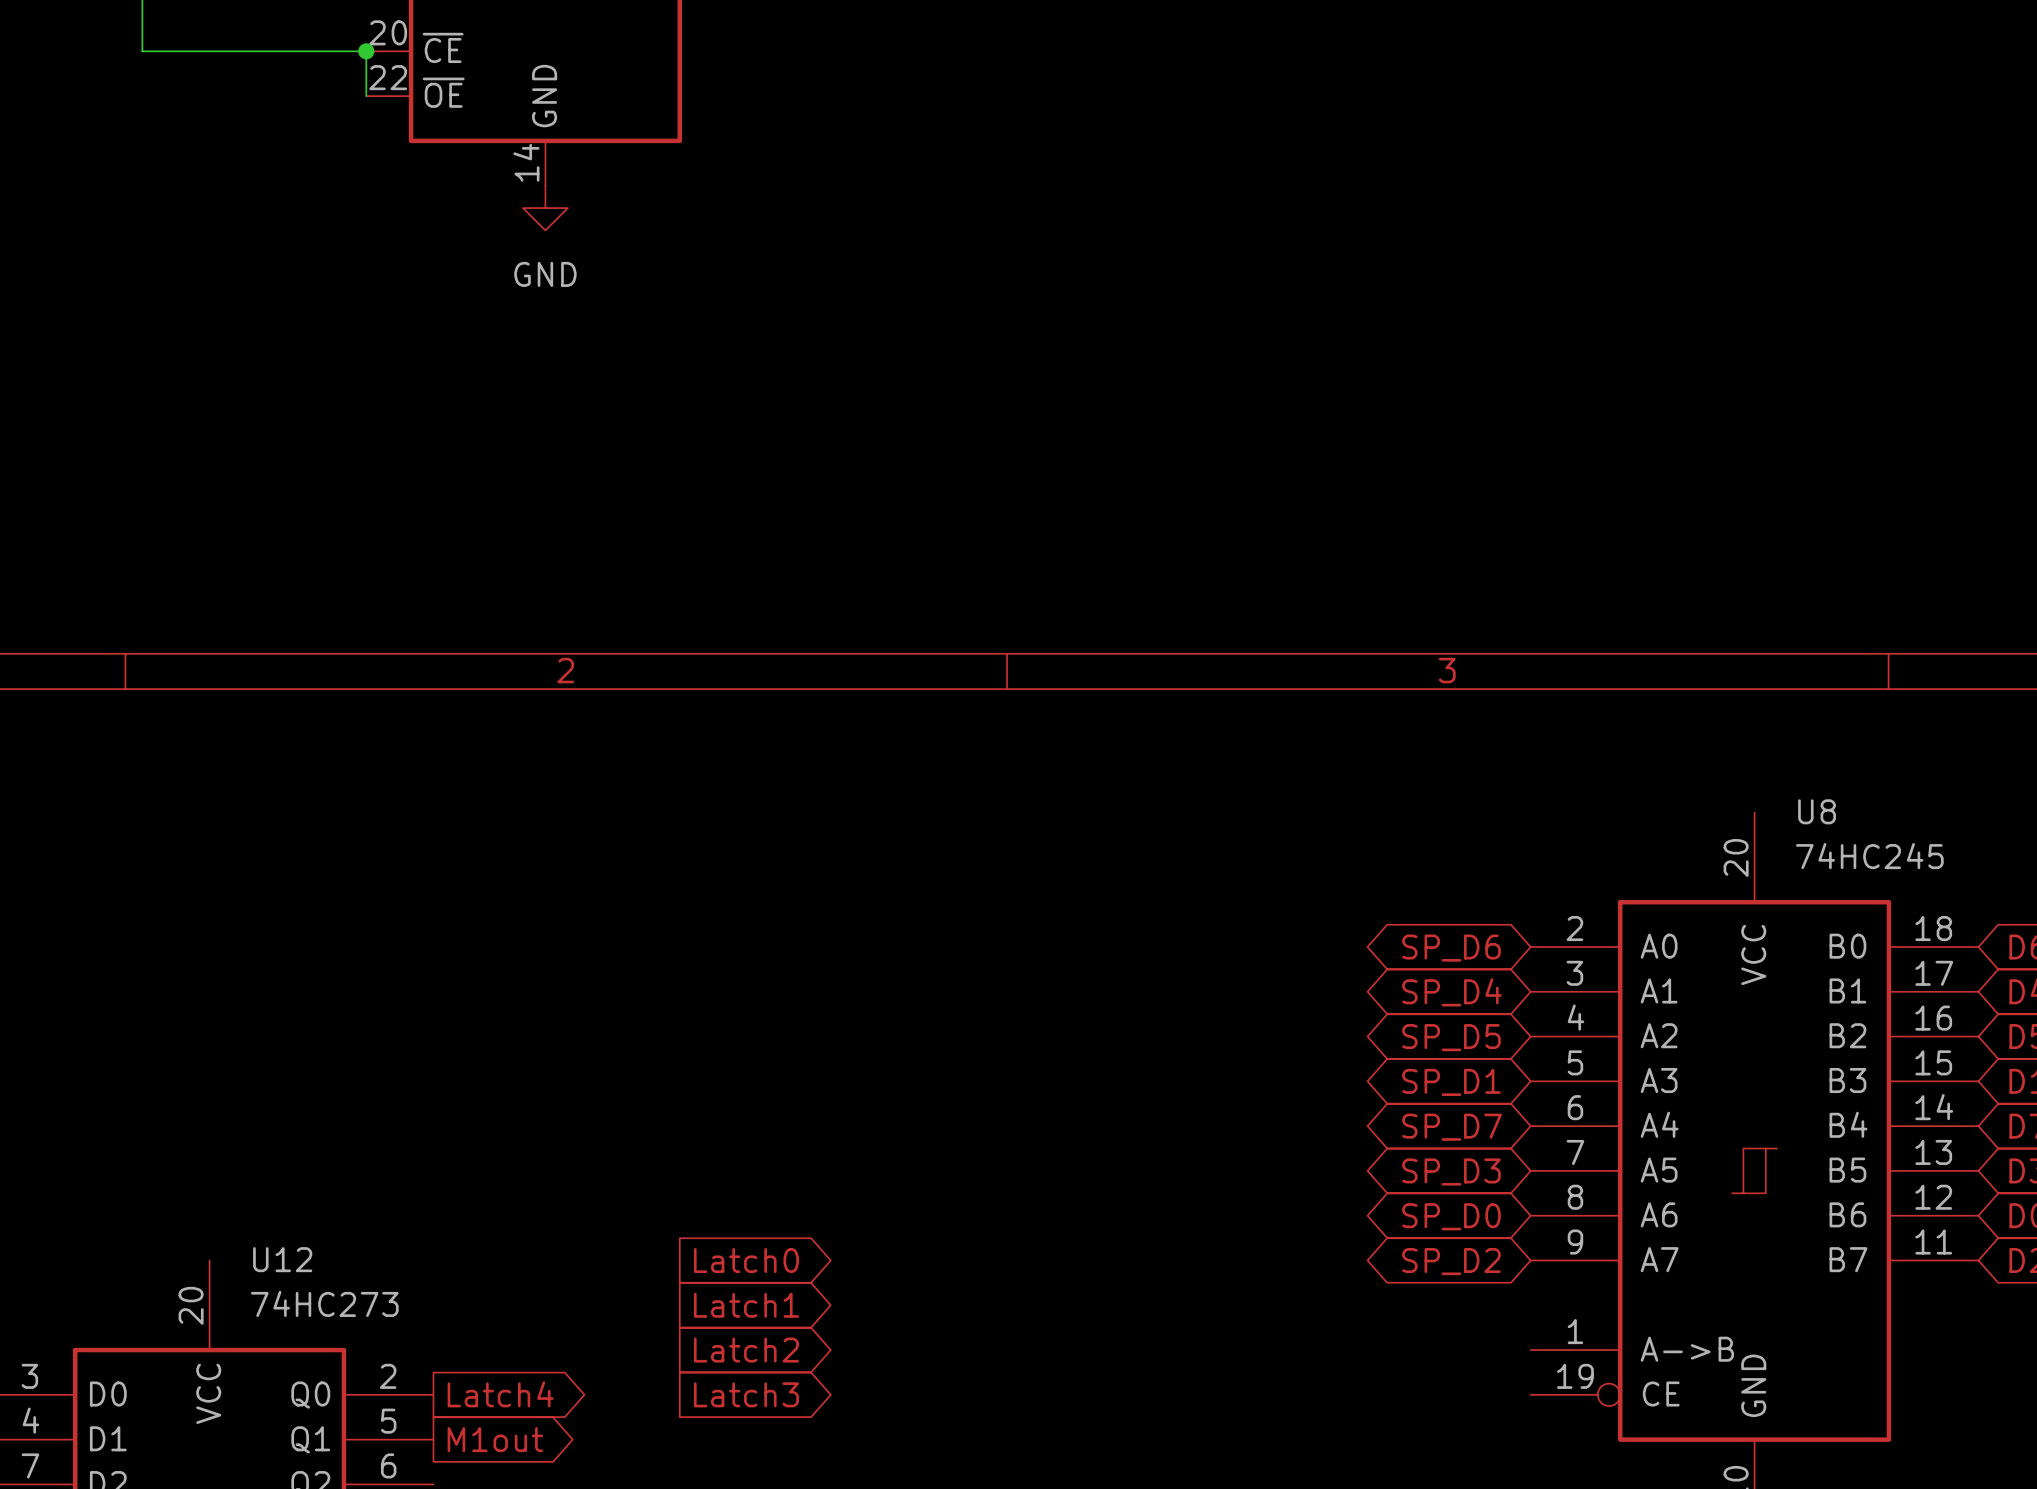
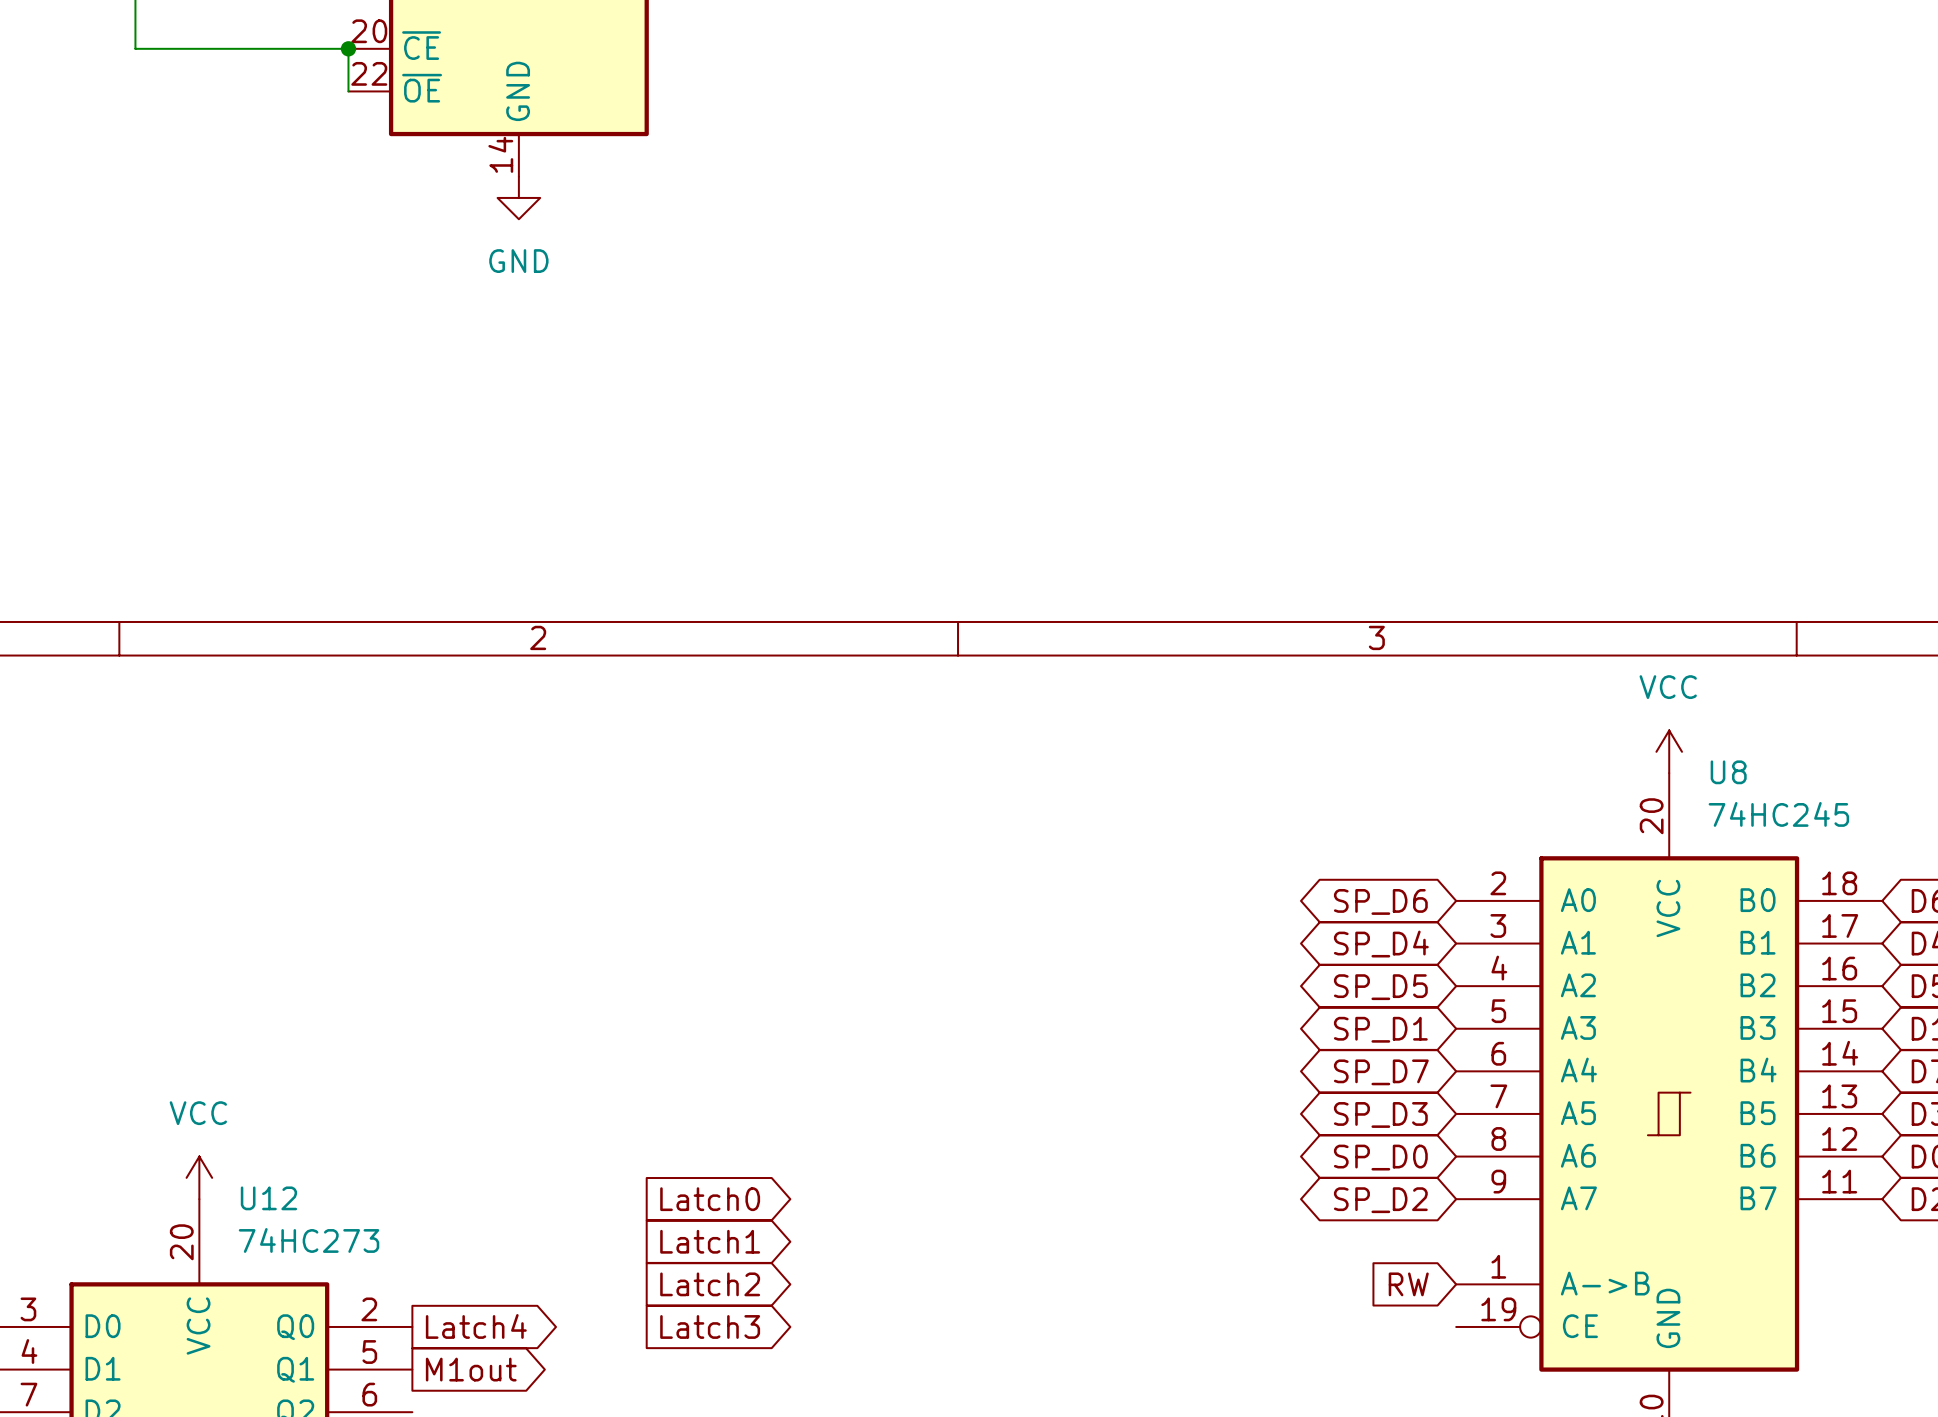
power symbol: none -> VCC (1669, 751)
power symbol: none -> VCC (199, 1177)
global label: none -> RW (1408, 1284)

